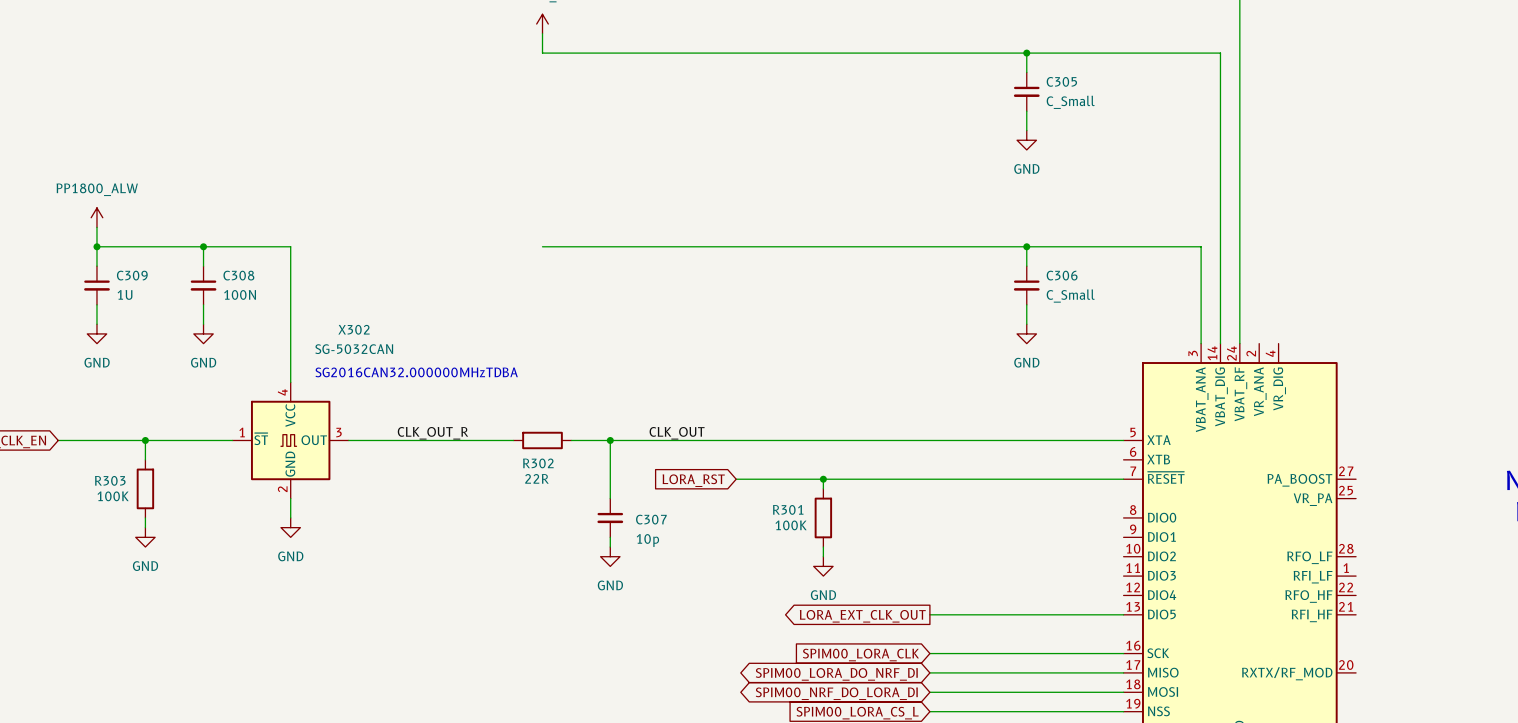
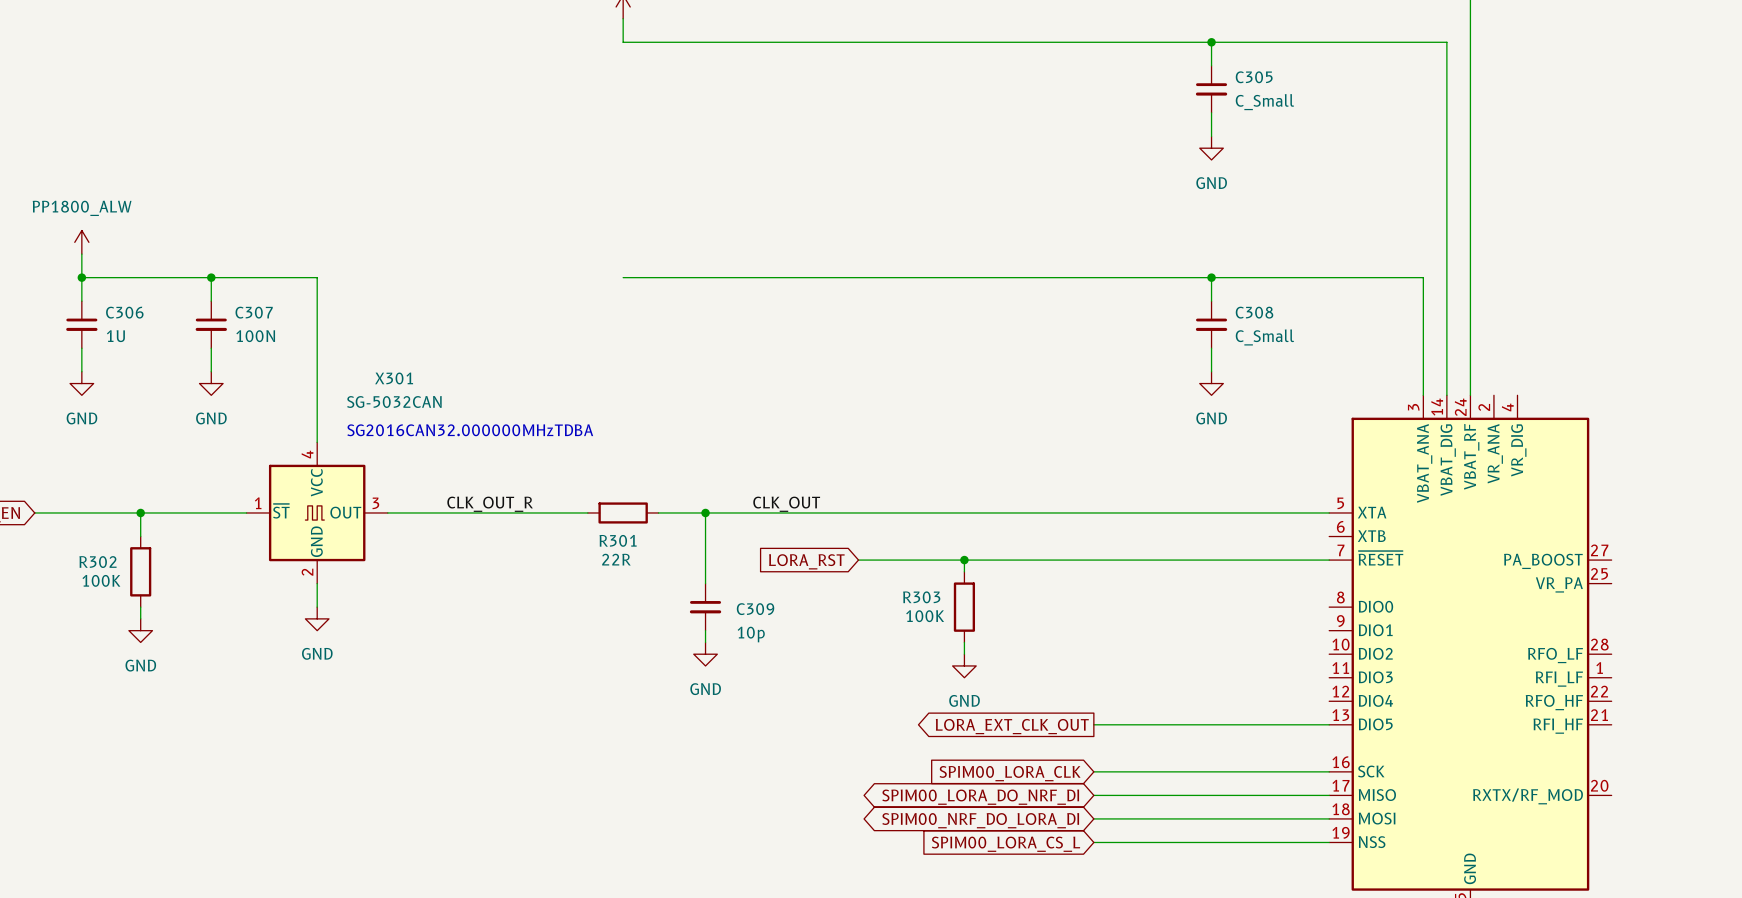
C309 name: C309 (132, 275) -> C306 (124, 312)
C308 name: C308 (238, 275) -> C307 (254, 312)
C306 name: C306 (1062, 275) -> C308 (1254, 312)
X302 name: X302 (354, 329) -> X301 (394, 378)
R302 name: R302 (538, 463) -> R301 (618, 540)
R303 name: R303 (110, 480) -> R302 (97, 562)
R301 name: R301 (788, 509) -> R303 (921, 597)
C307 name: C307 (651, 519) -> C309 (755, 609)

